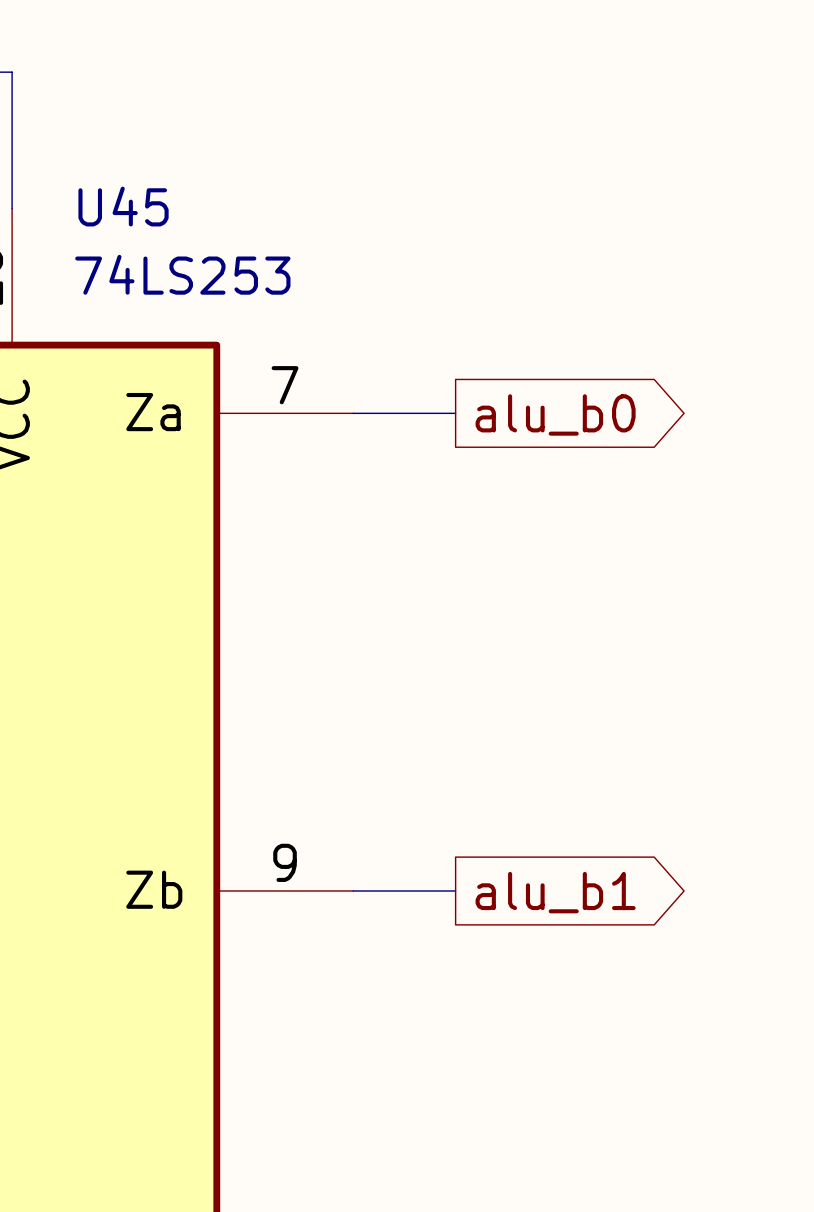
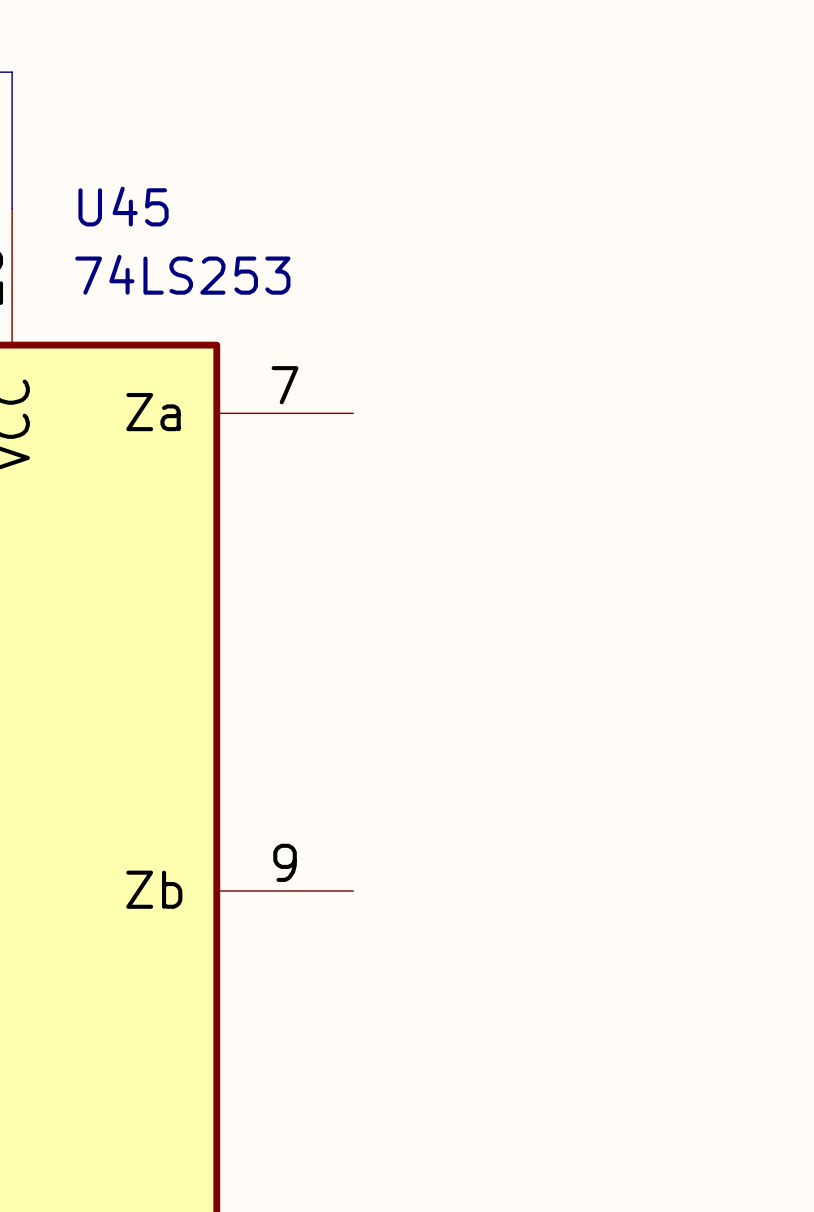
wire: (353, 413) (455, 413) -> none
global label: alu_b0 (555, 414) -> none
wire: (353, 891) (455, 891) -> none
global label: alu_b1 (555, 892) -> none

